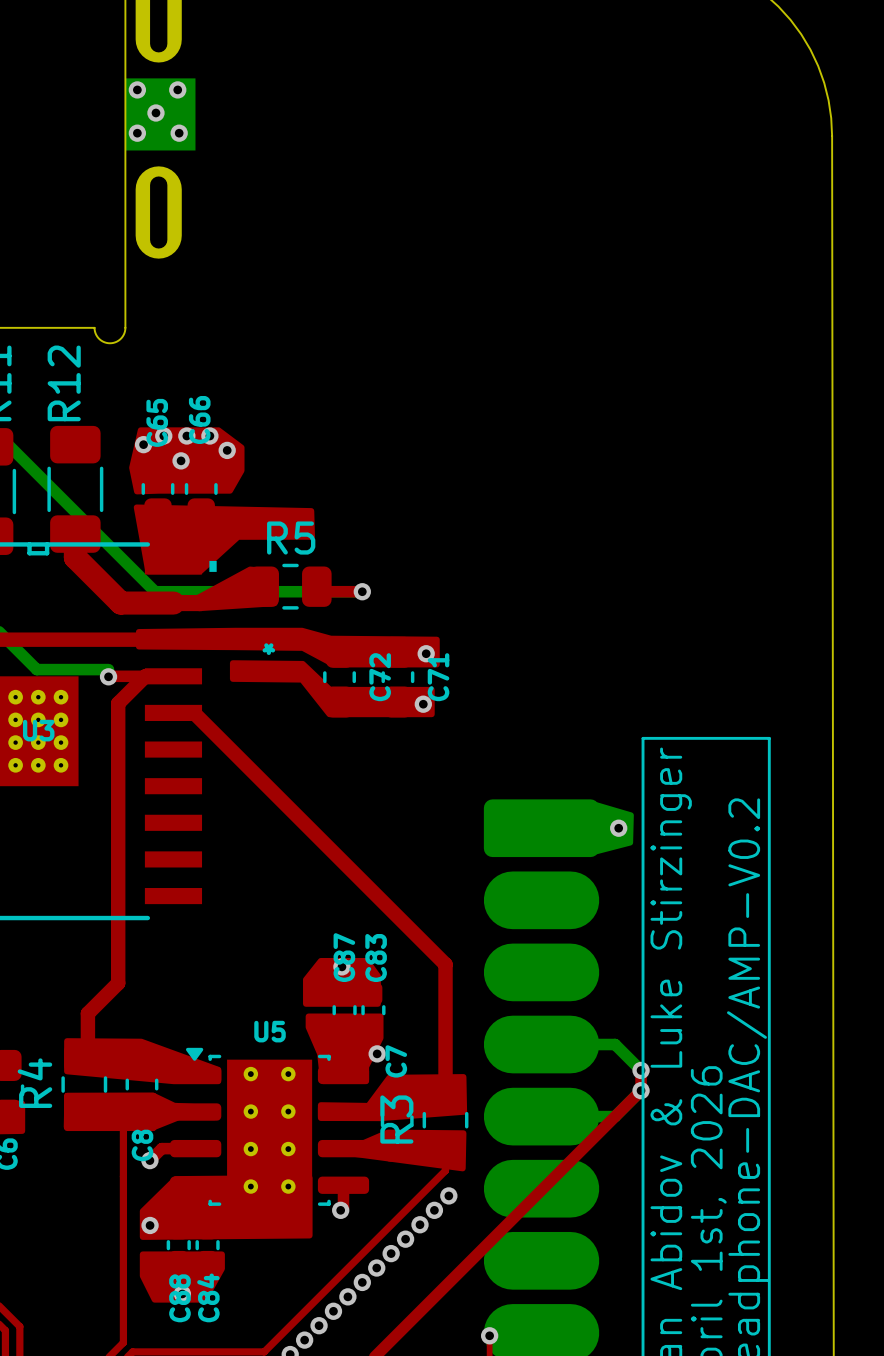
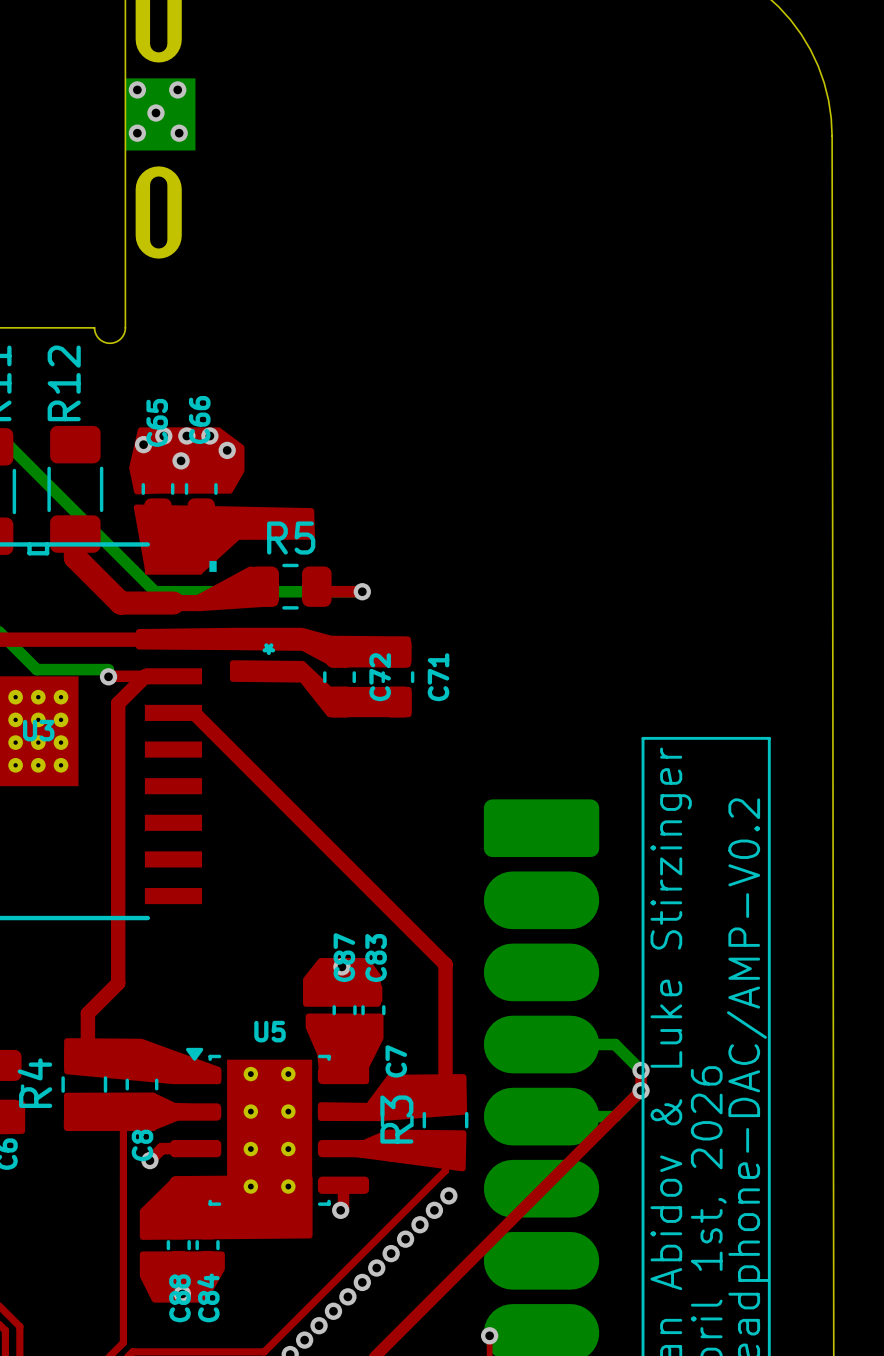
drawing shape: [135, 627, 440, 668] -> [135, 627, 411, 668]
via: (426, 653) -> none
drawing shape: [229, 660, 435, 718] -> [229, 660, 412, 718]
via: (423, 704) -> none
drawing: [588, 801, 634, 856] -> none
via: (618, 828) -> none
via: (377, 1053) -> none
via: (150, 1225) -> none

